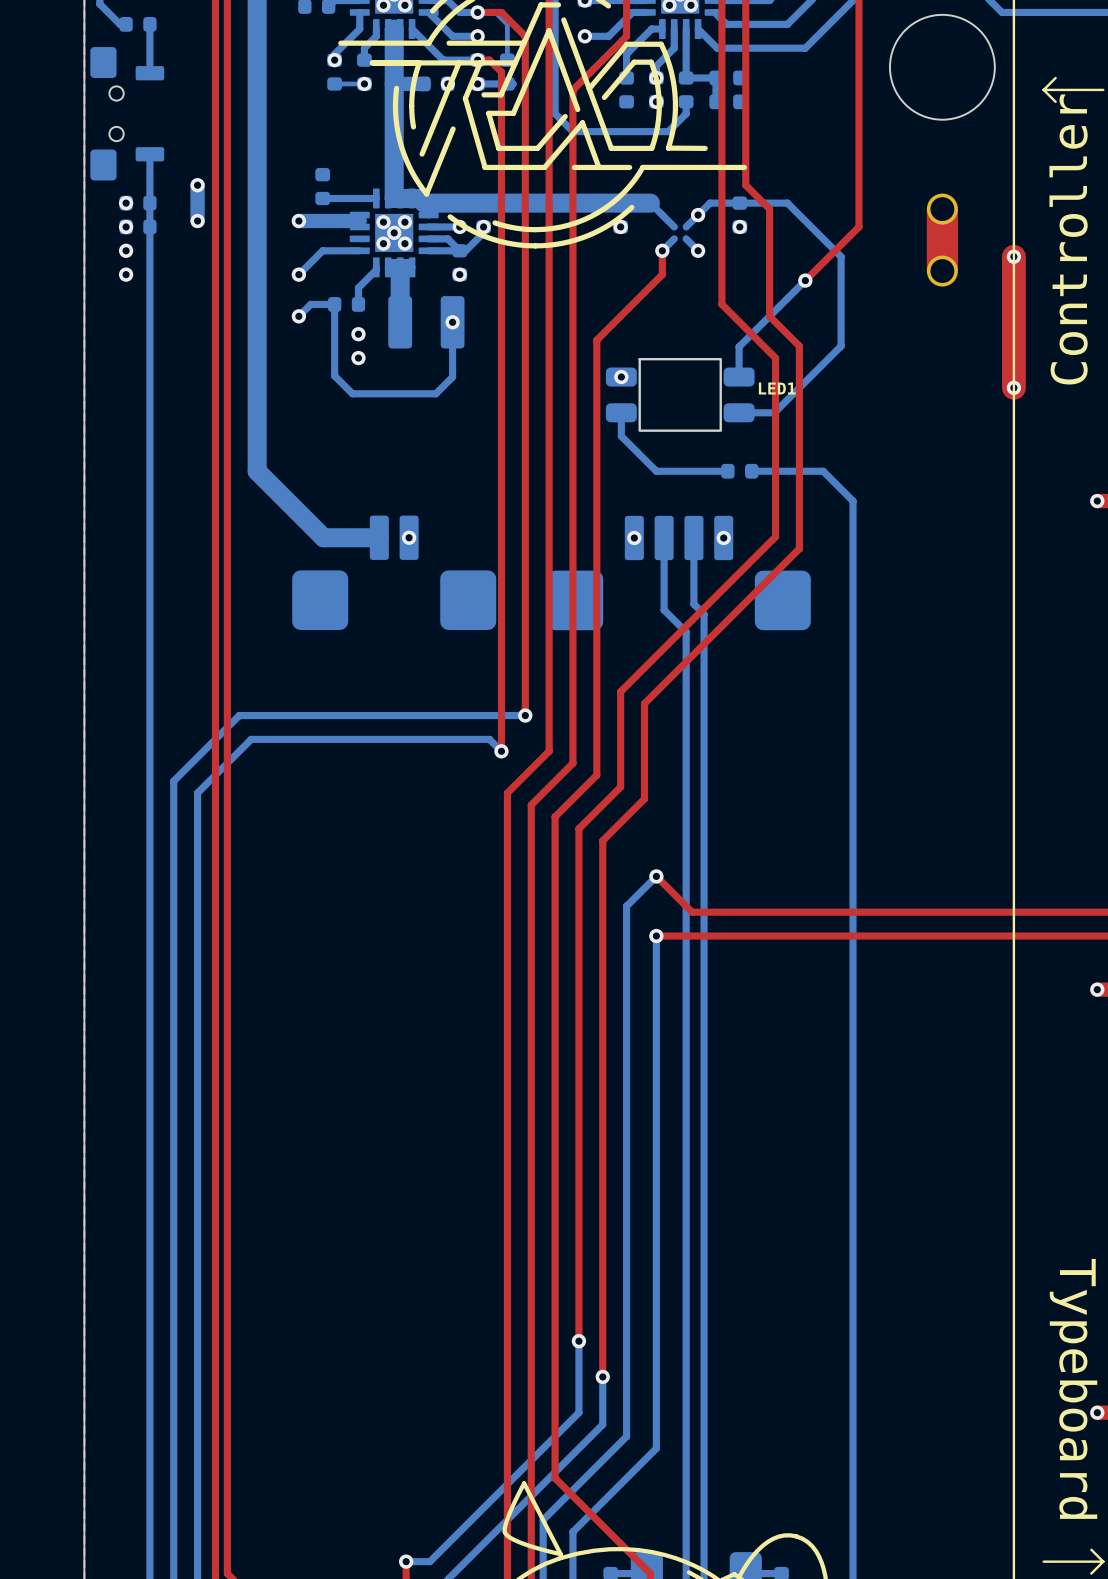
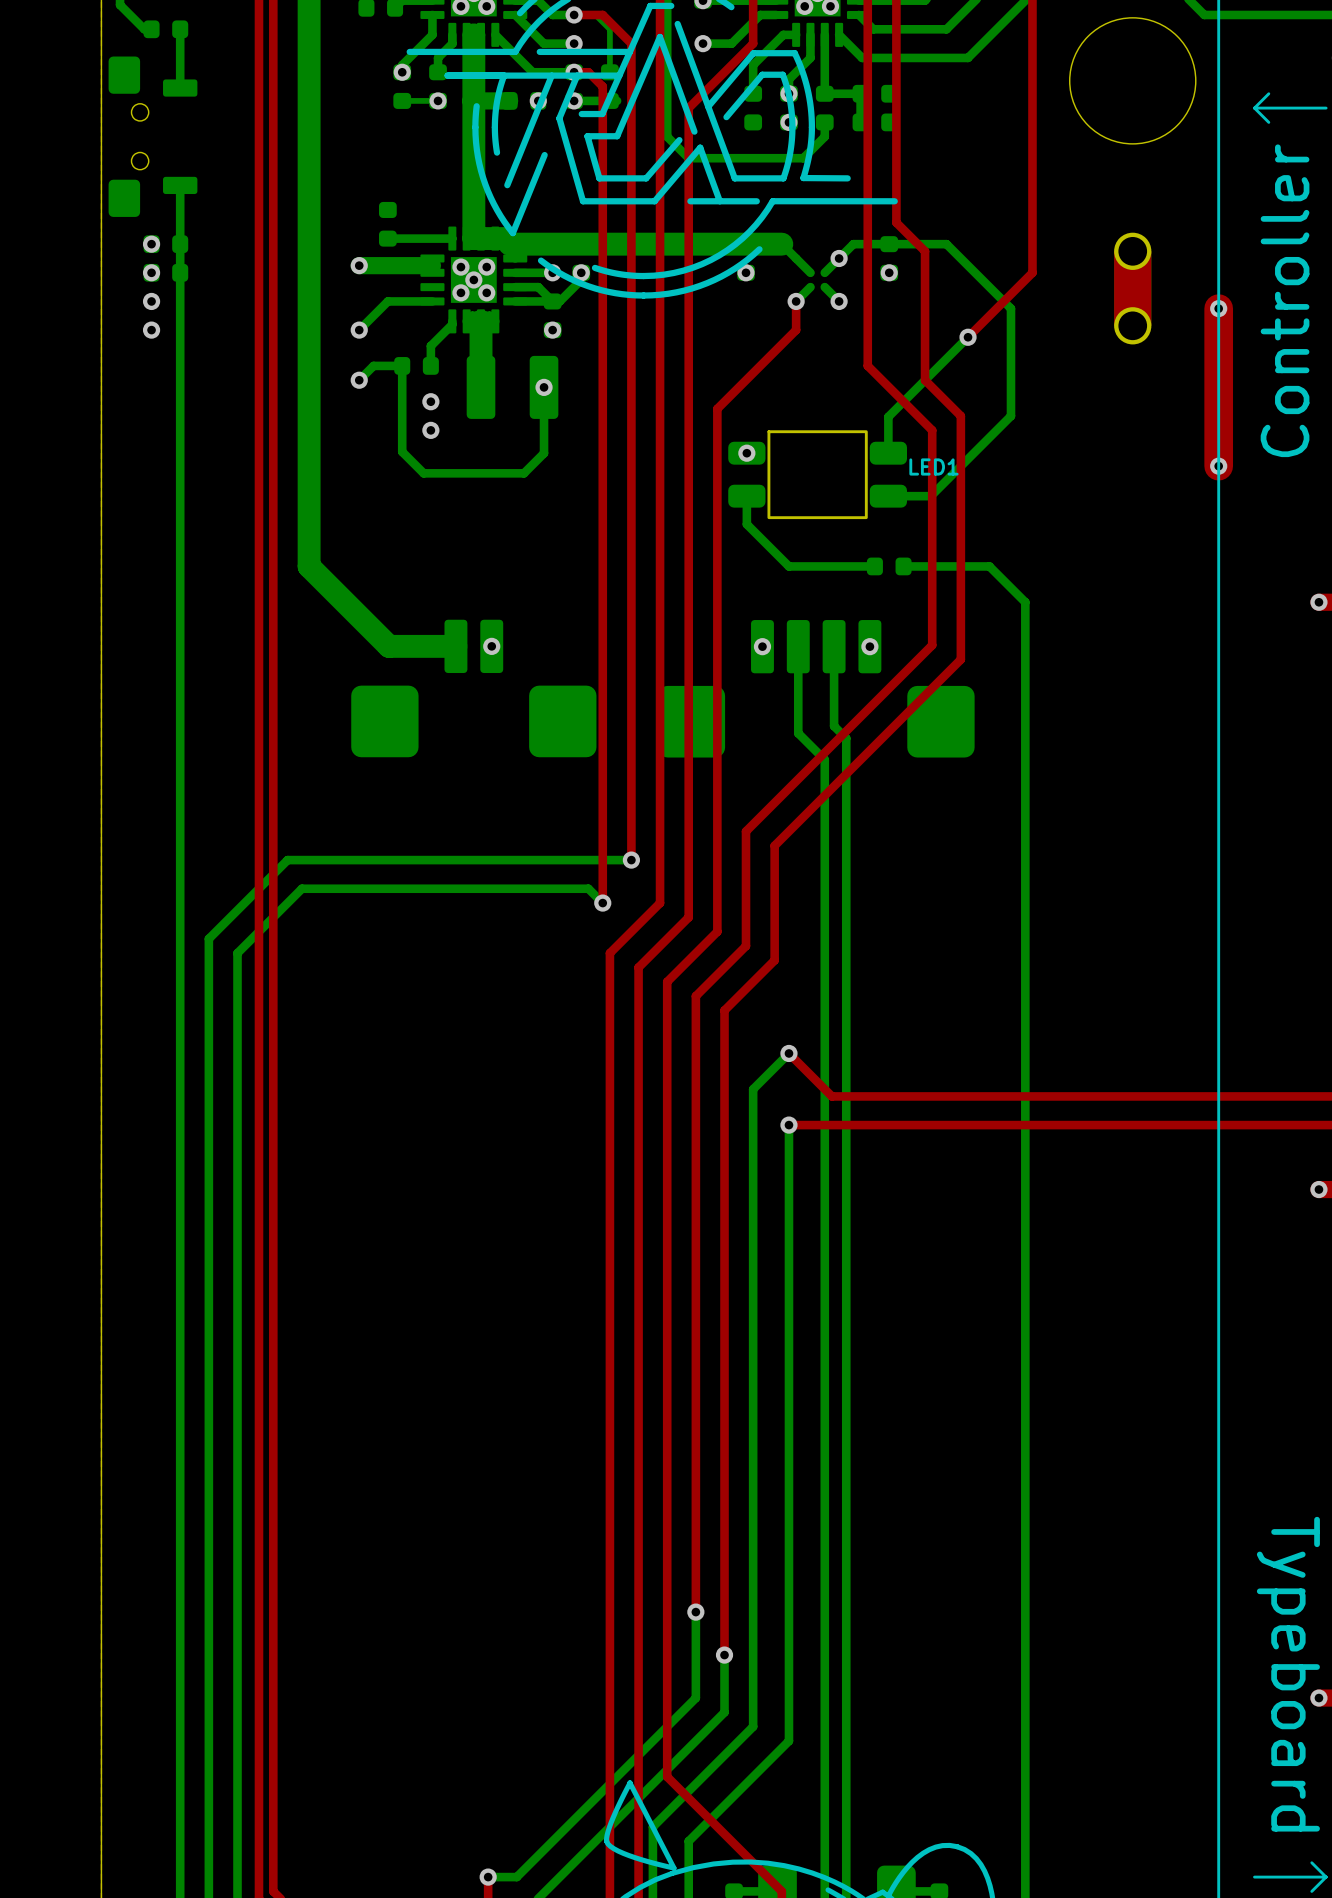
bottom track: (197, 185) (197, 221) -> none
via: (197, 185) -> none
via: (197, 221) -> none

